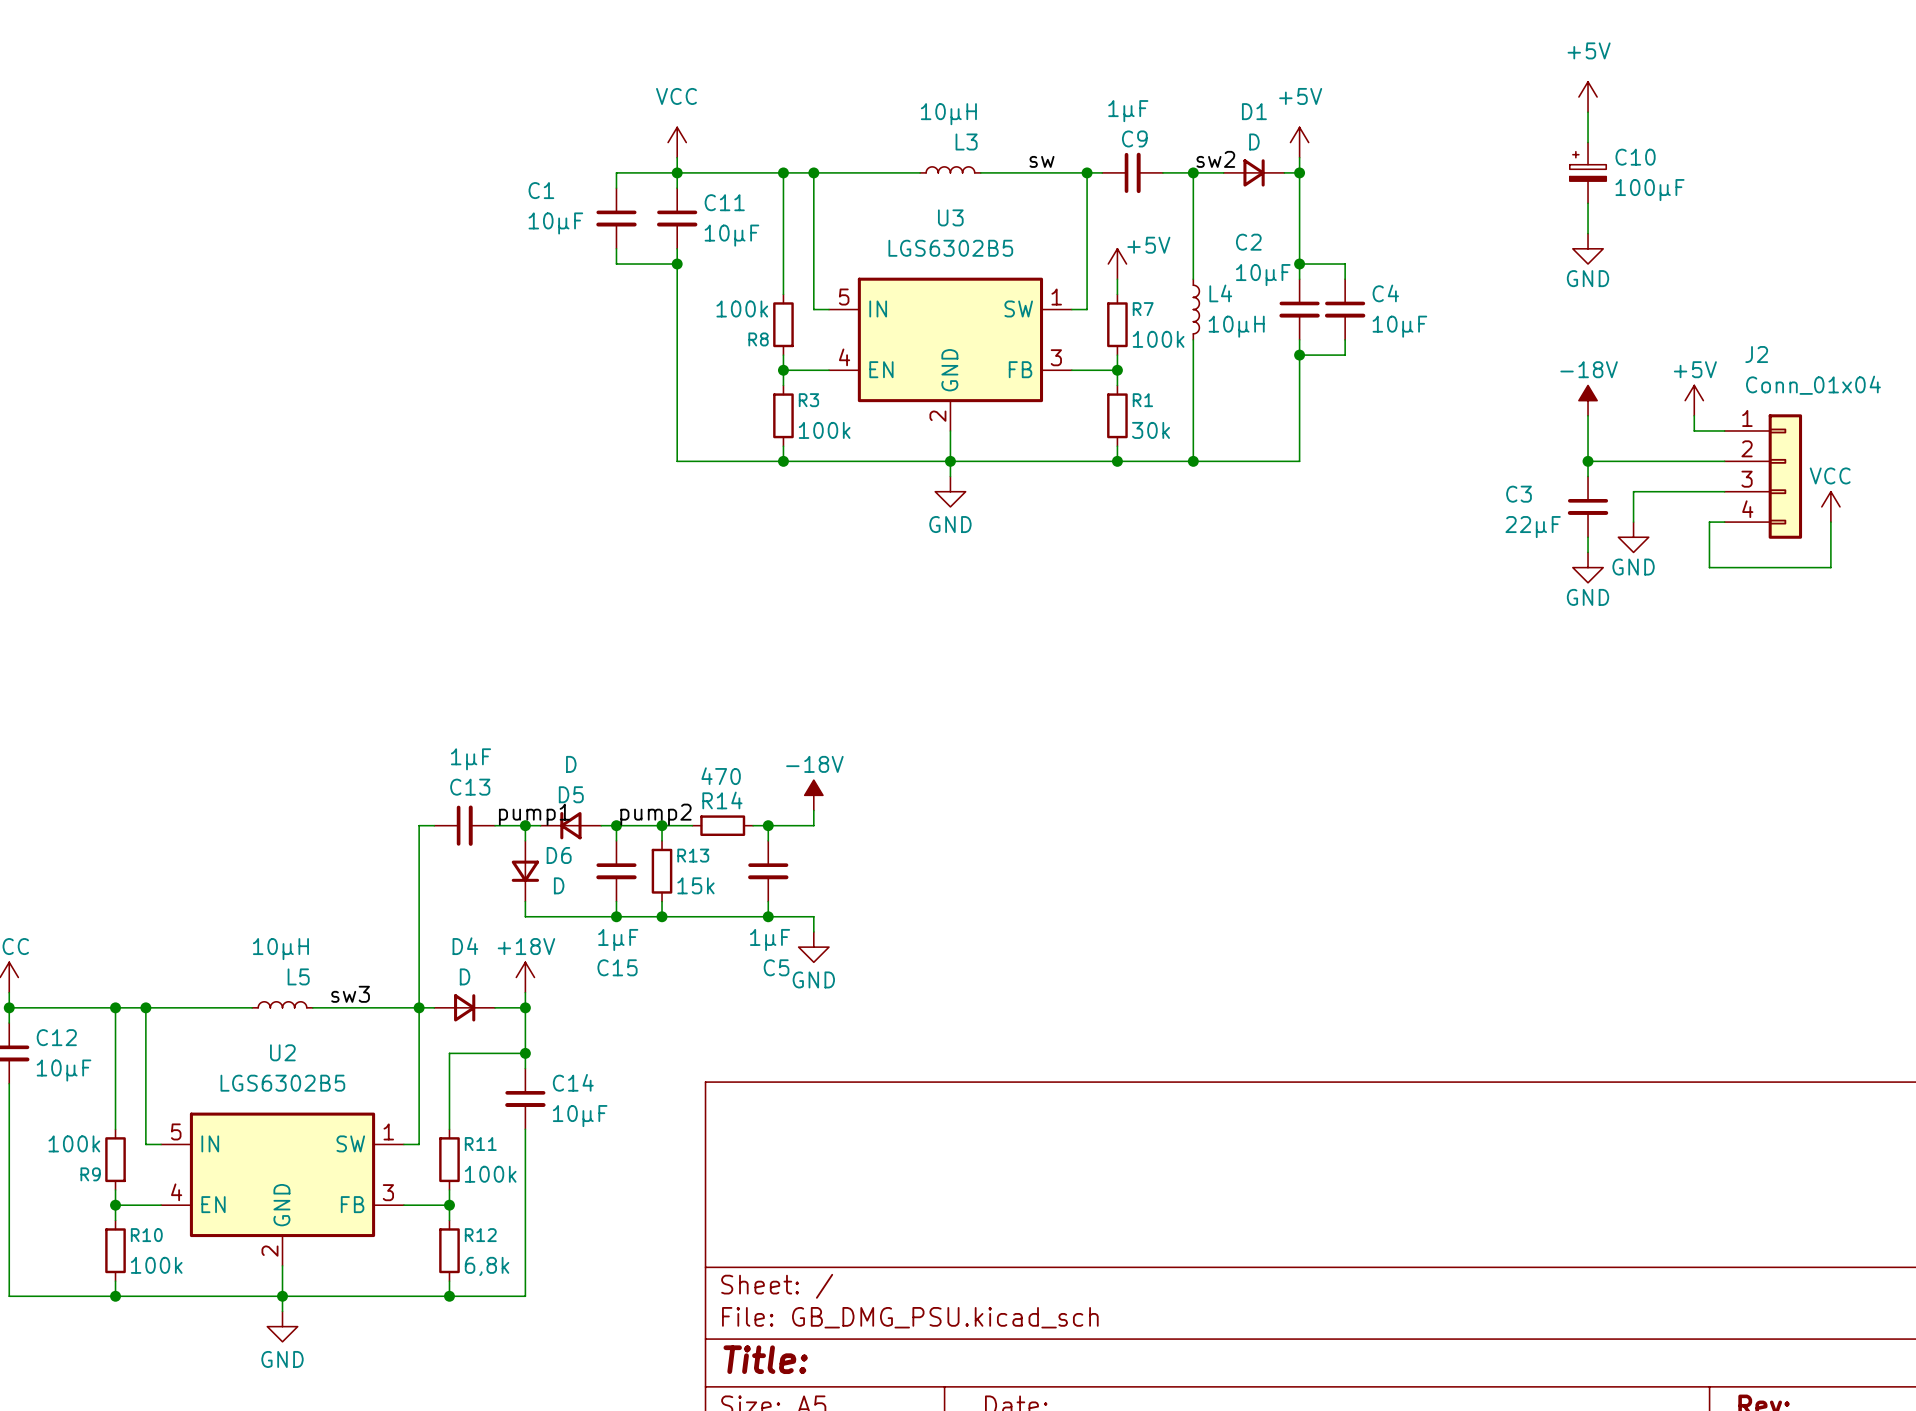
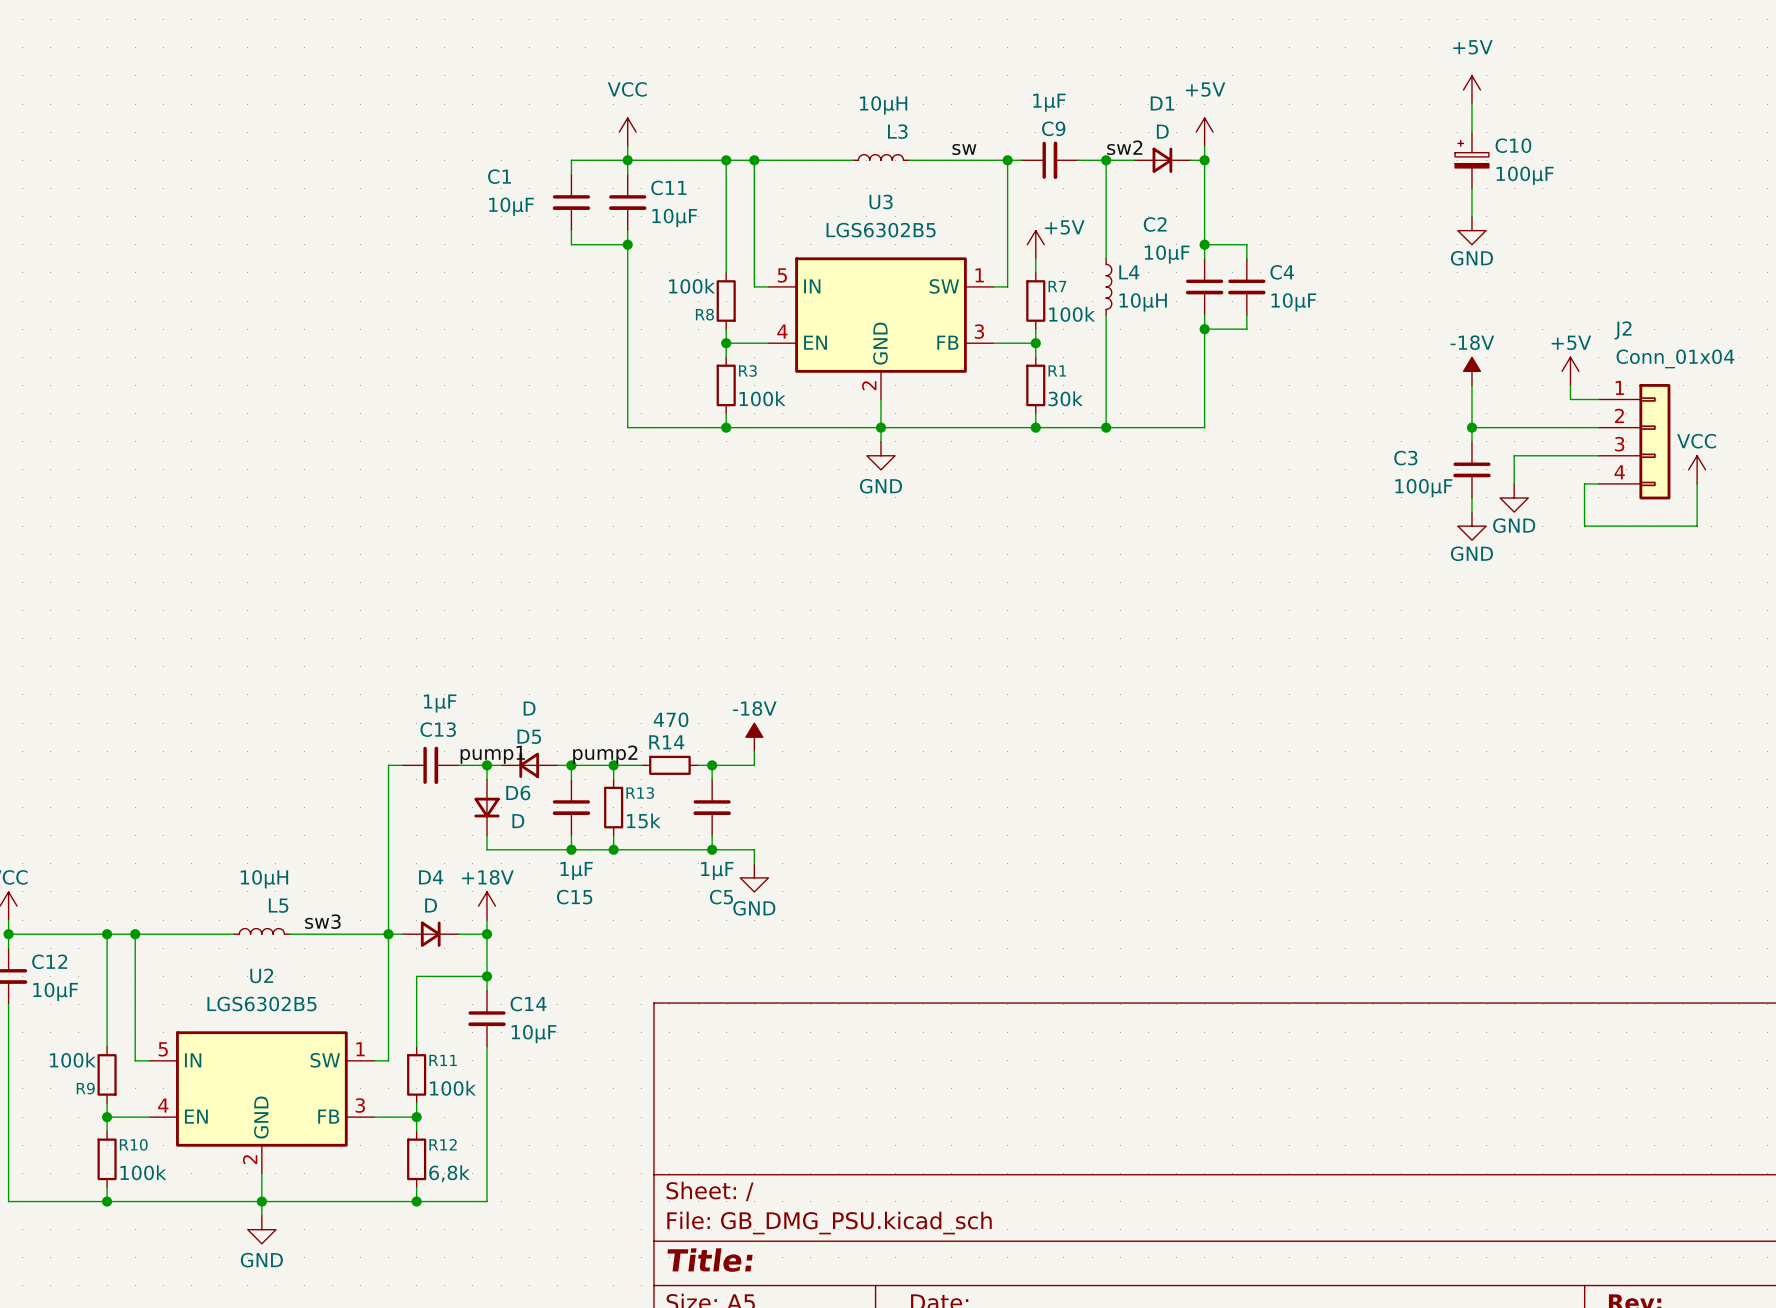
C3 value: 22µF (1533, 527) -> 100µF (1423, 488)

